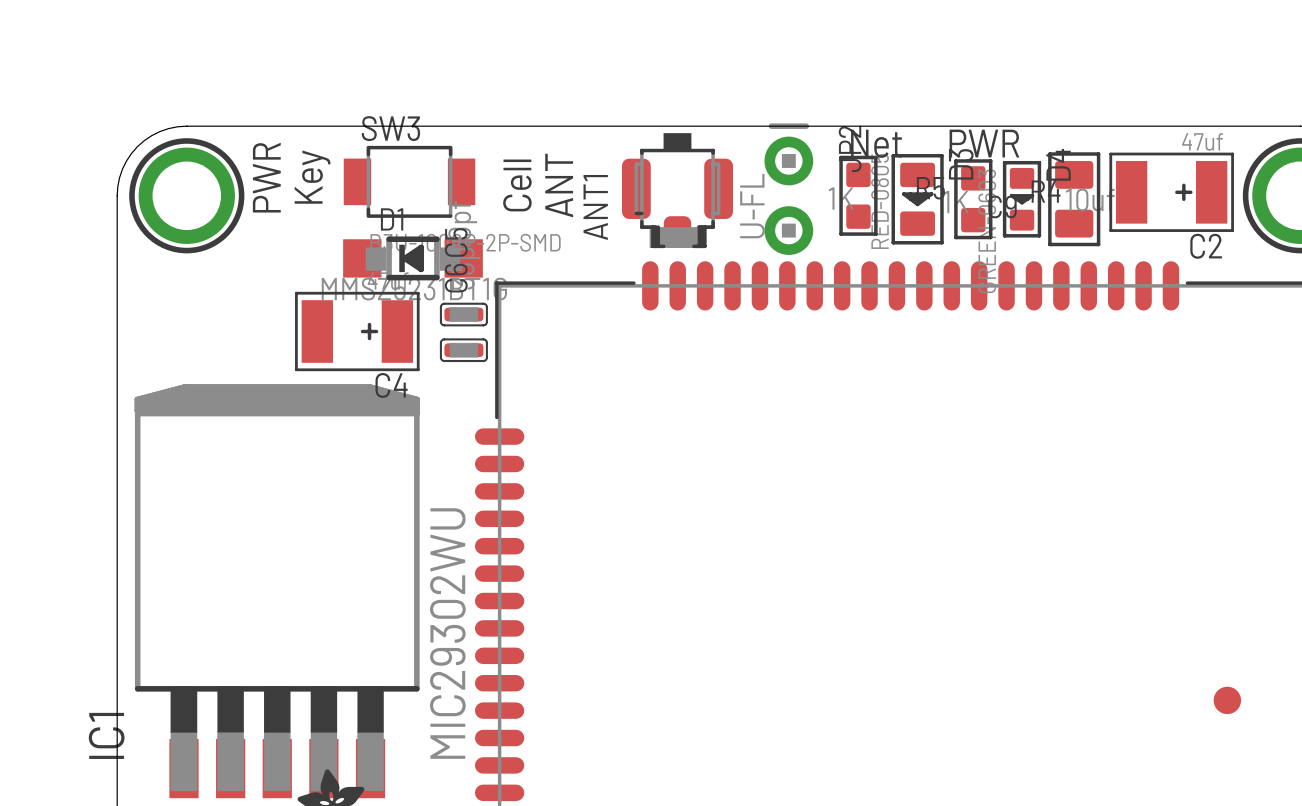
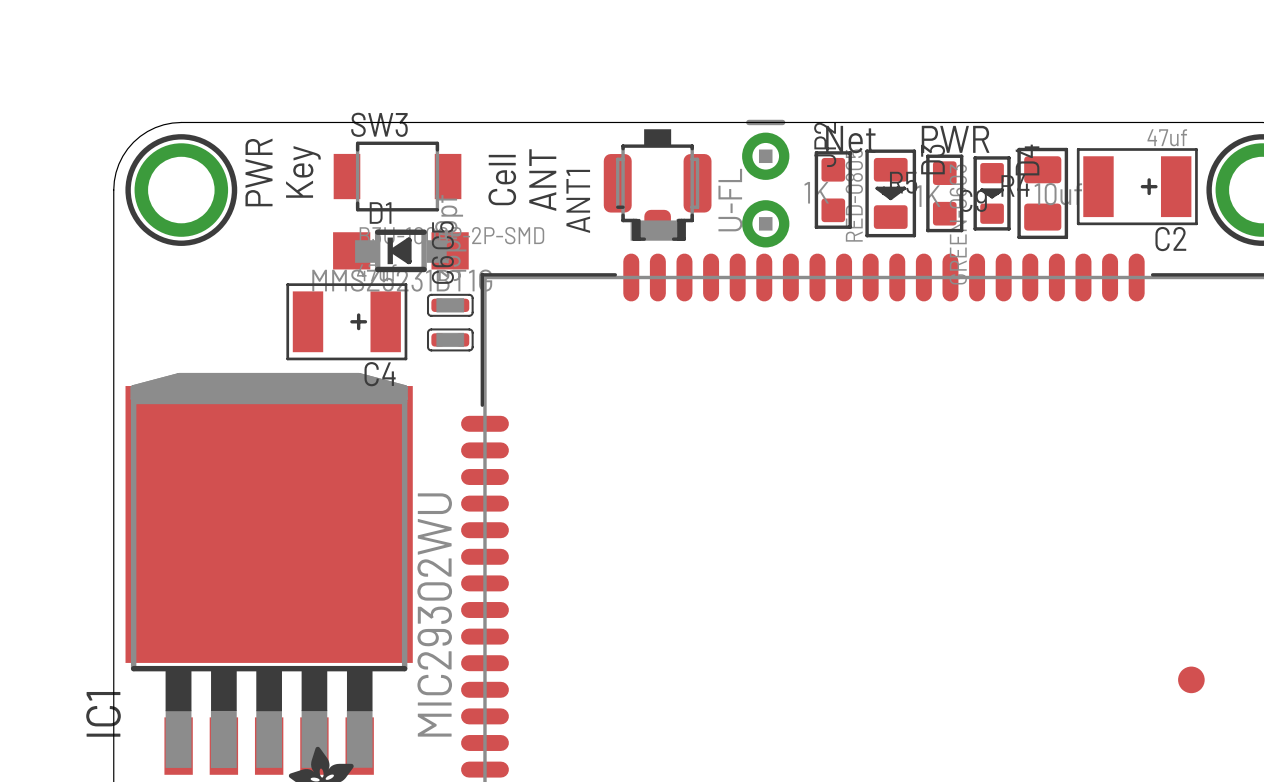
IC1 footprint: [134, 384, 420, 799] -> [125, 372, 413, 775]

